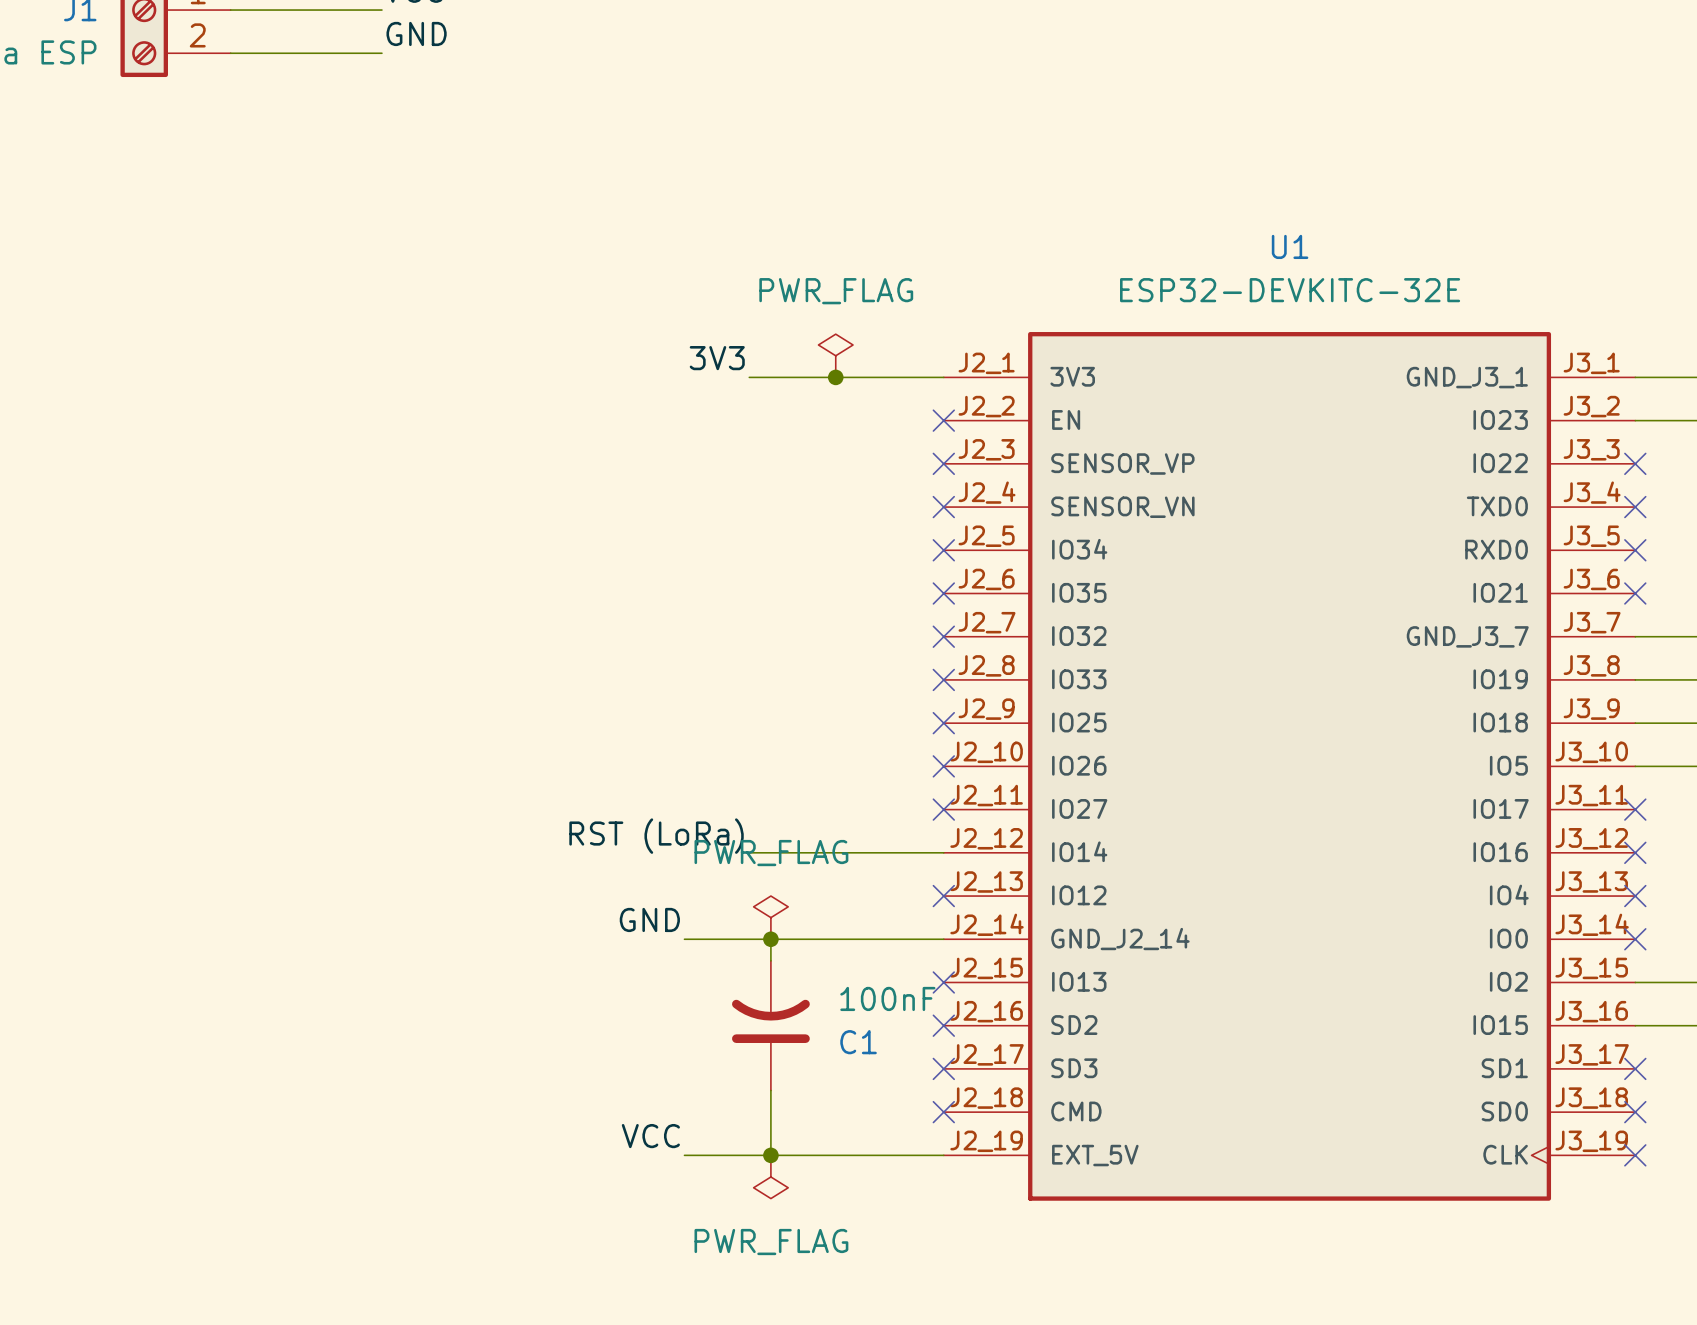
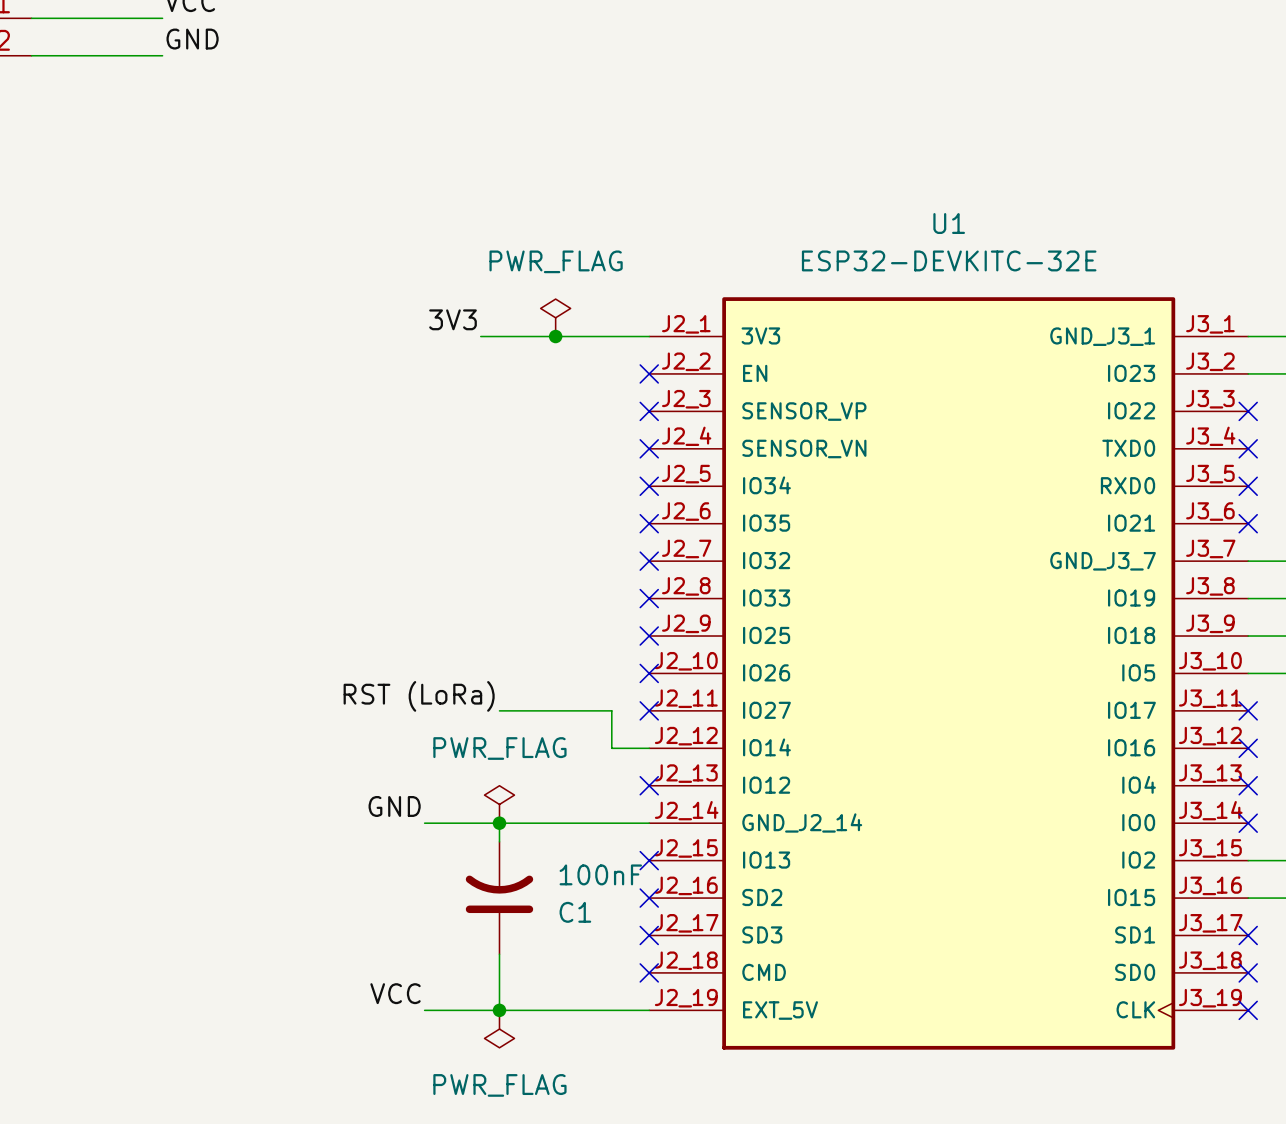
label position: RST (LoRa) (656, 836) -> RST (LoRa) (419, 696)
wire: (749, 852) (900, 852) -> (499, 710) (611, 710) (611, 748)

